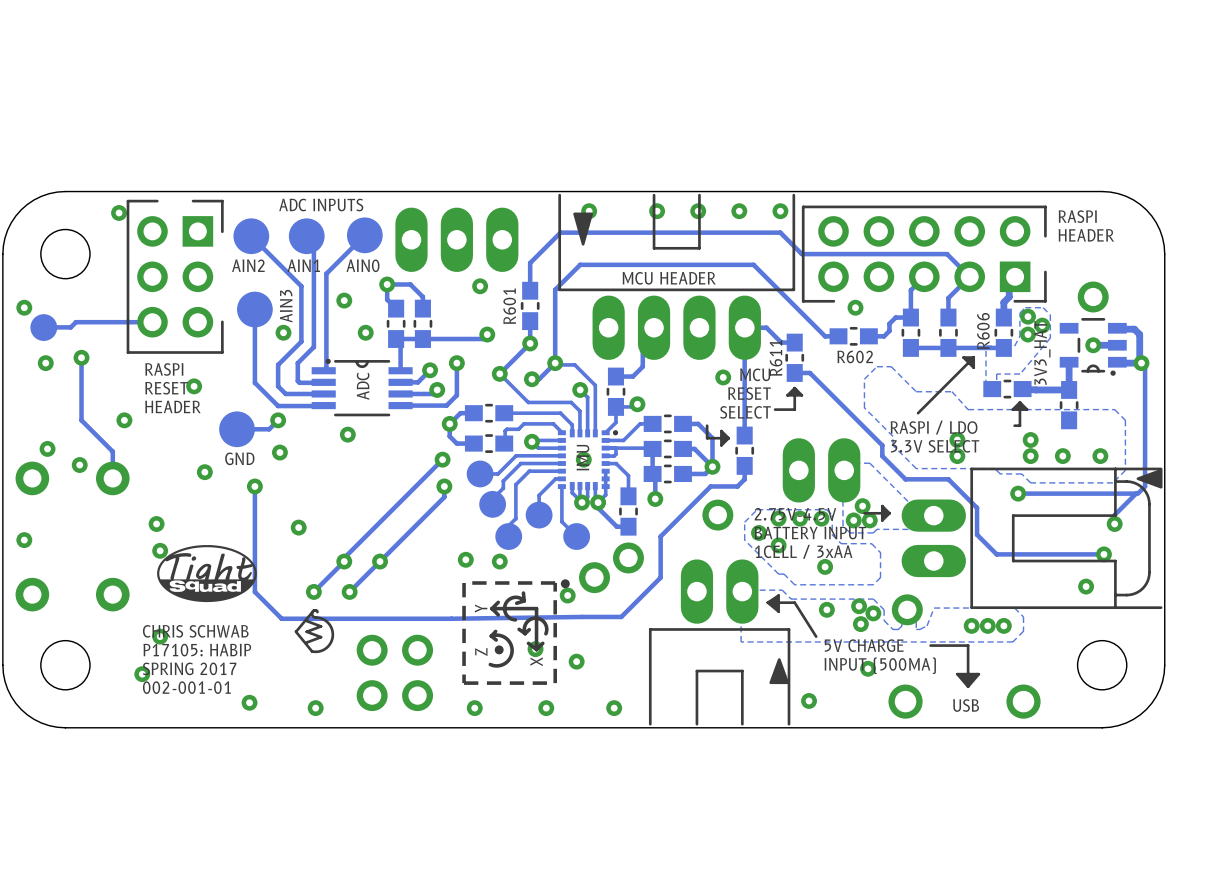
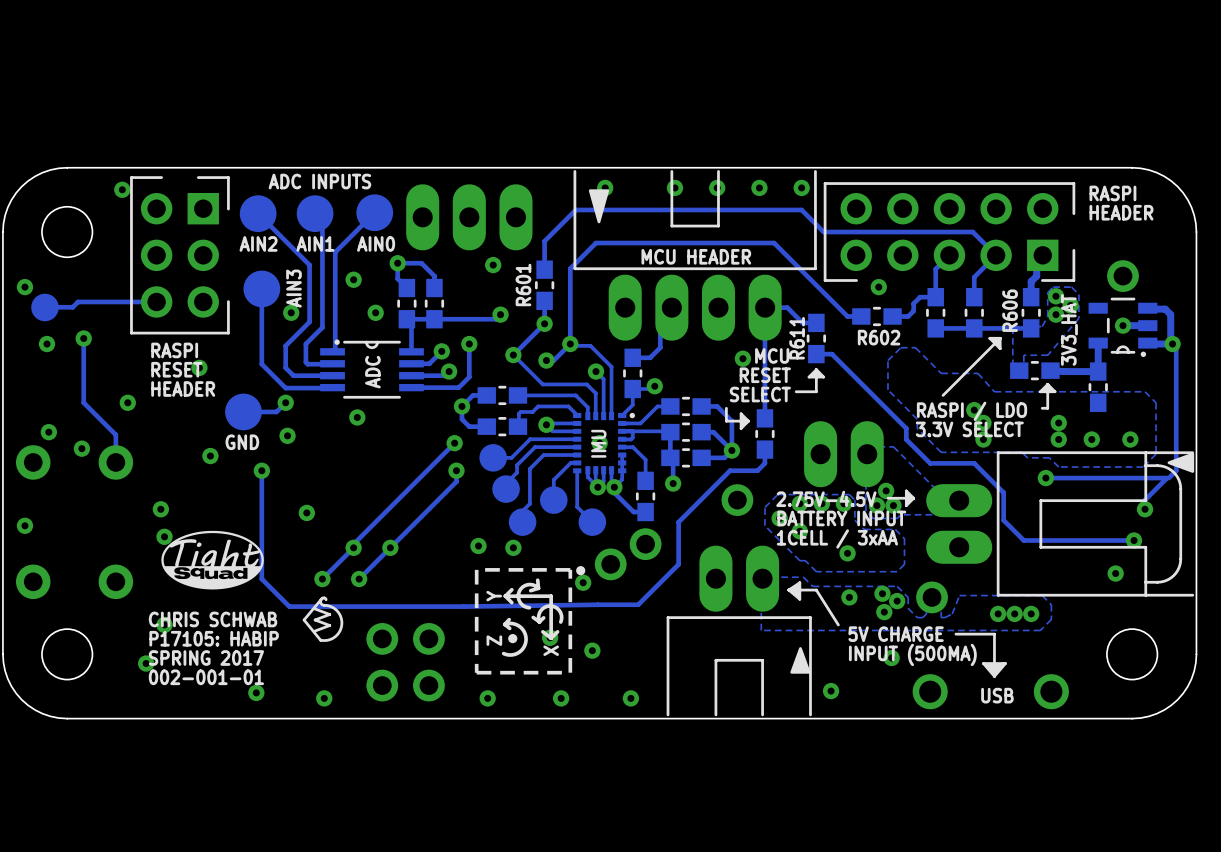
via: none -> (974, 410)

